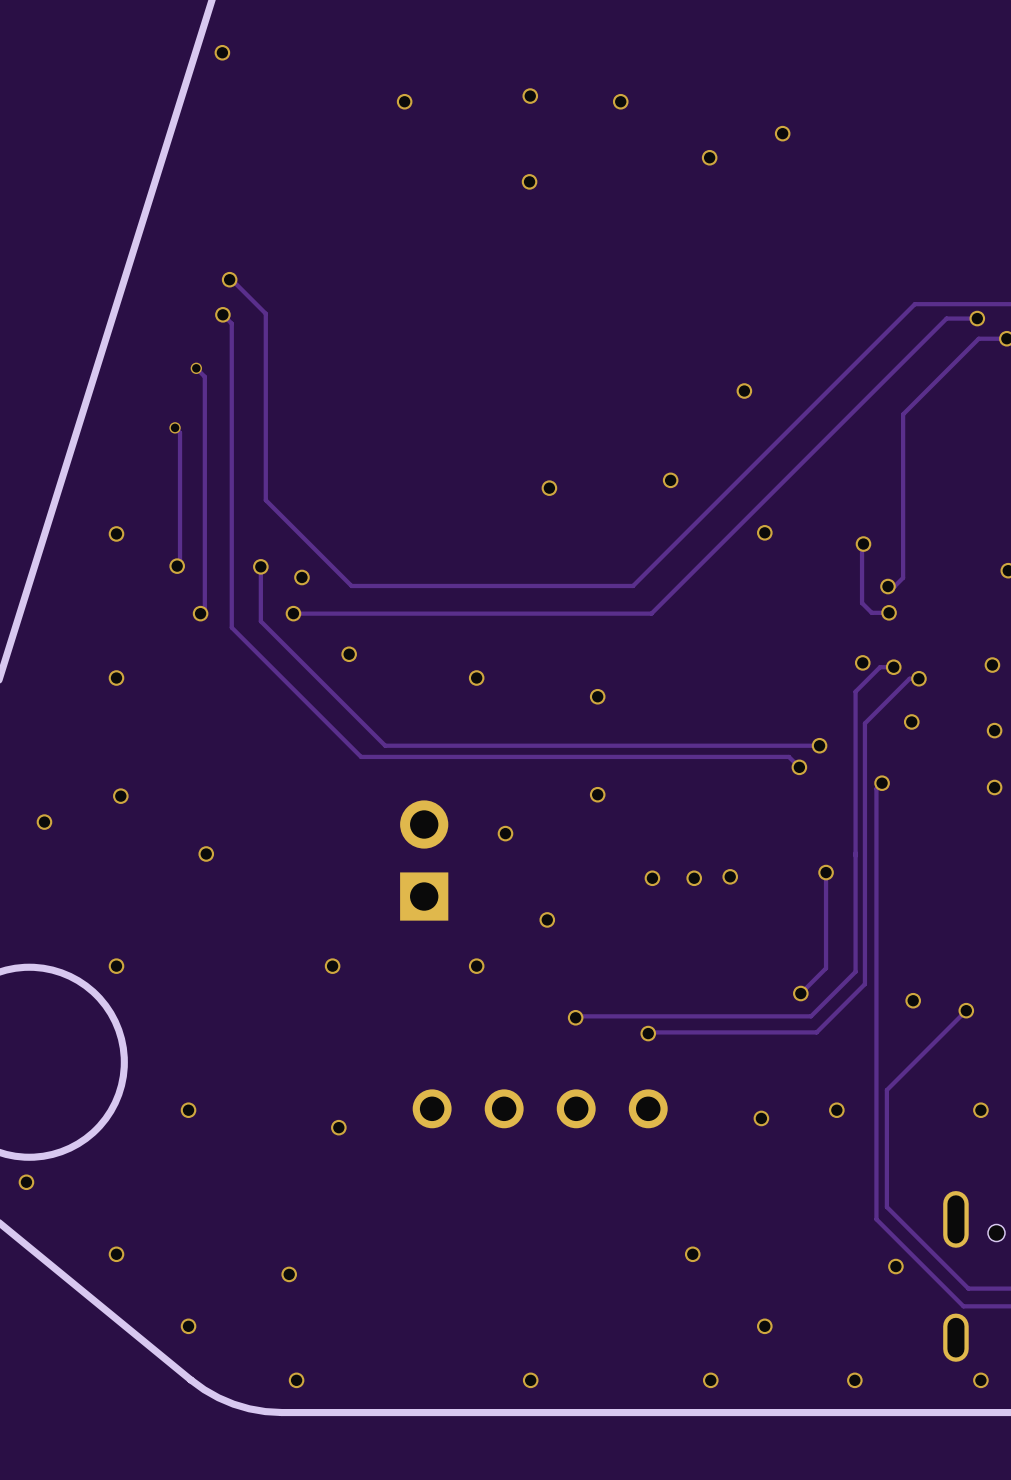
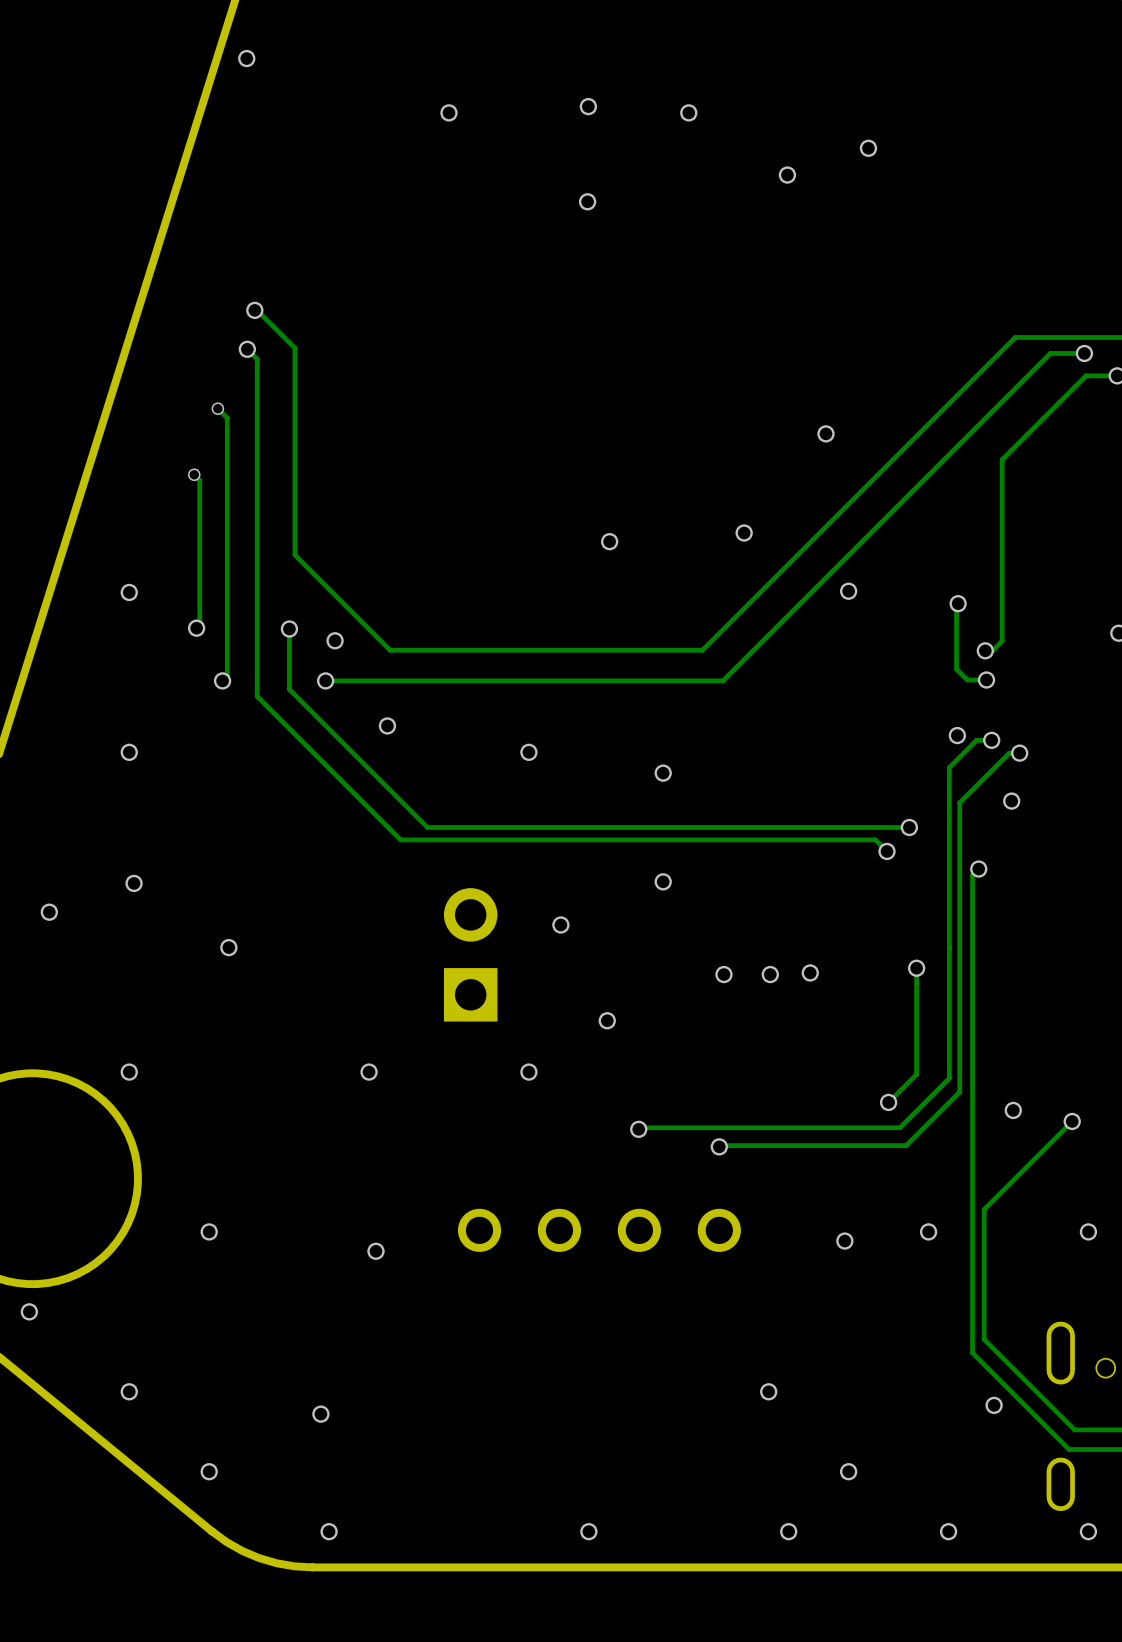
via: (992, 665) -> none
via: (994, 730) -> none
via: (994, 787) -> none

